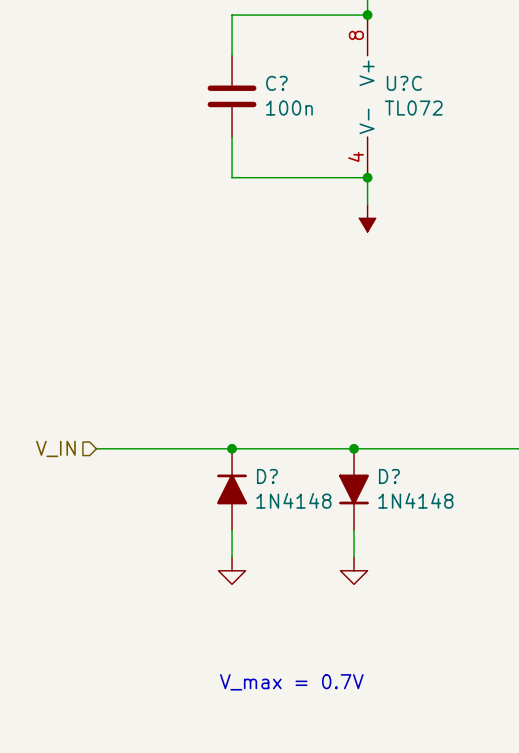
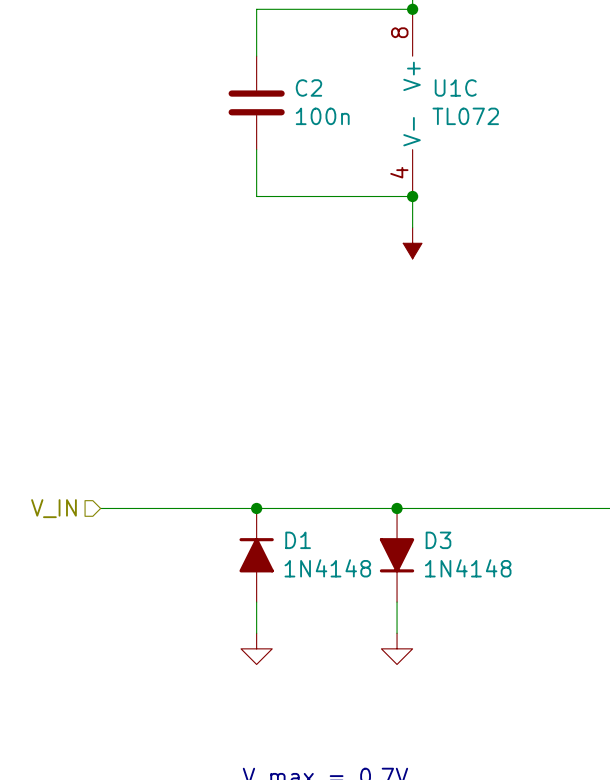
C? name: C? (276, 83) -> C2 (308, 87)
U?C name: U?C (404, 83) -> U1C (455, 87)
D? name: D? (267, 476) -> D1 (298, 540)
D? name: D? (389, 476) -> D3 (438, 540)

